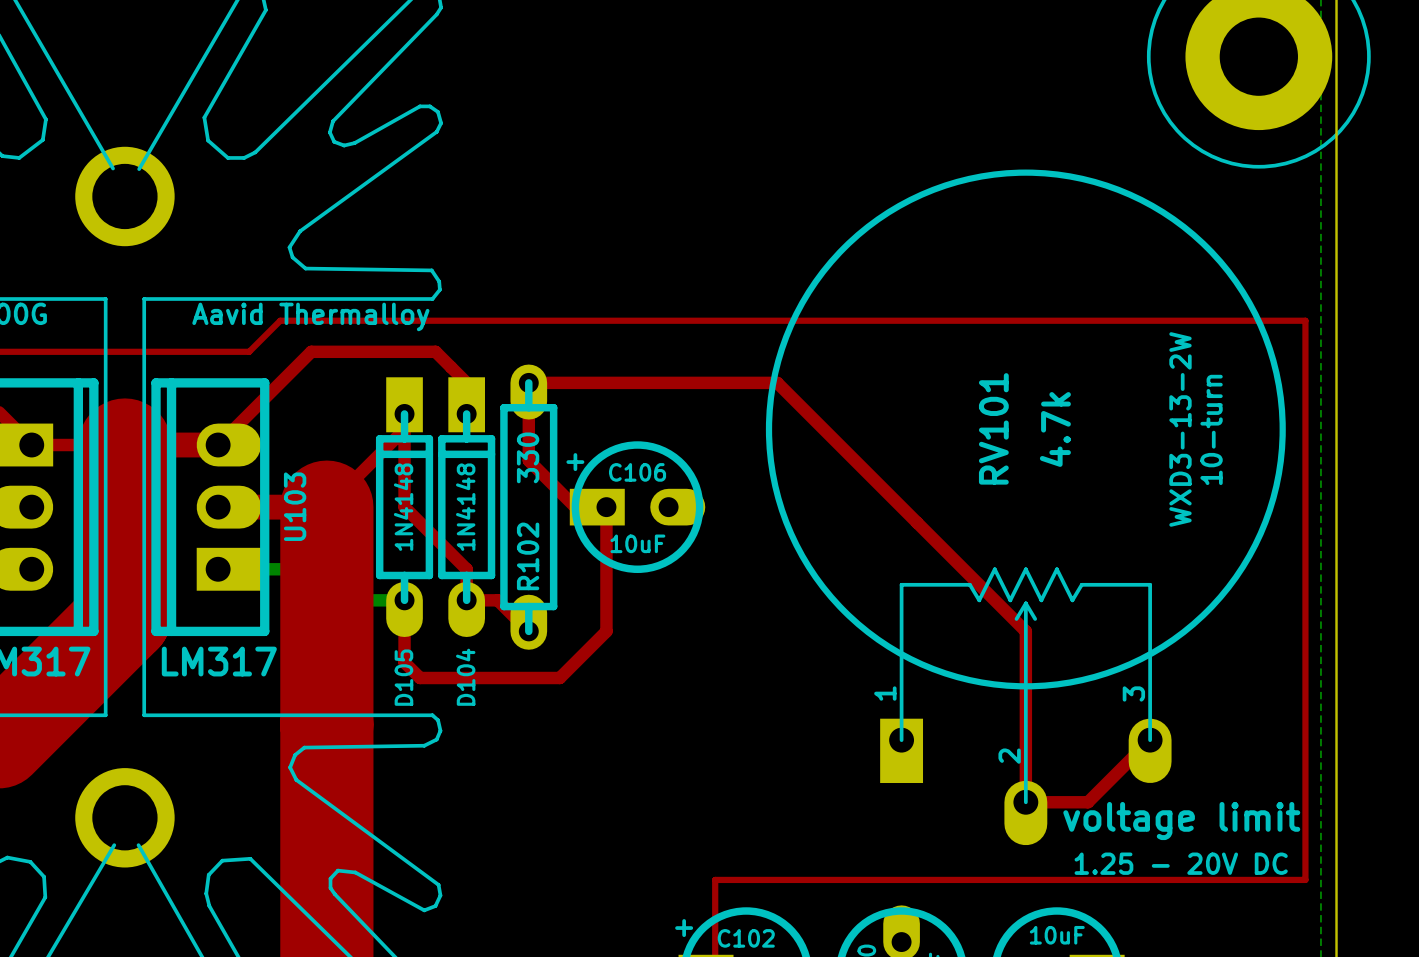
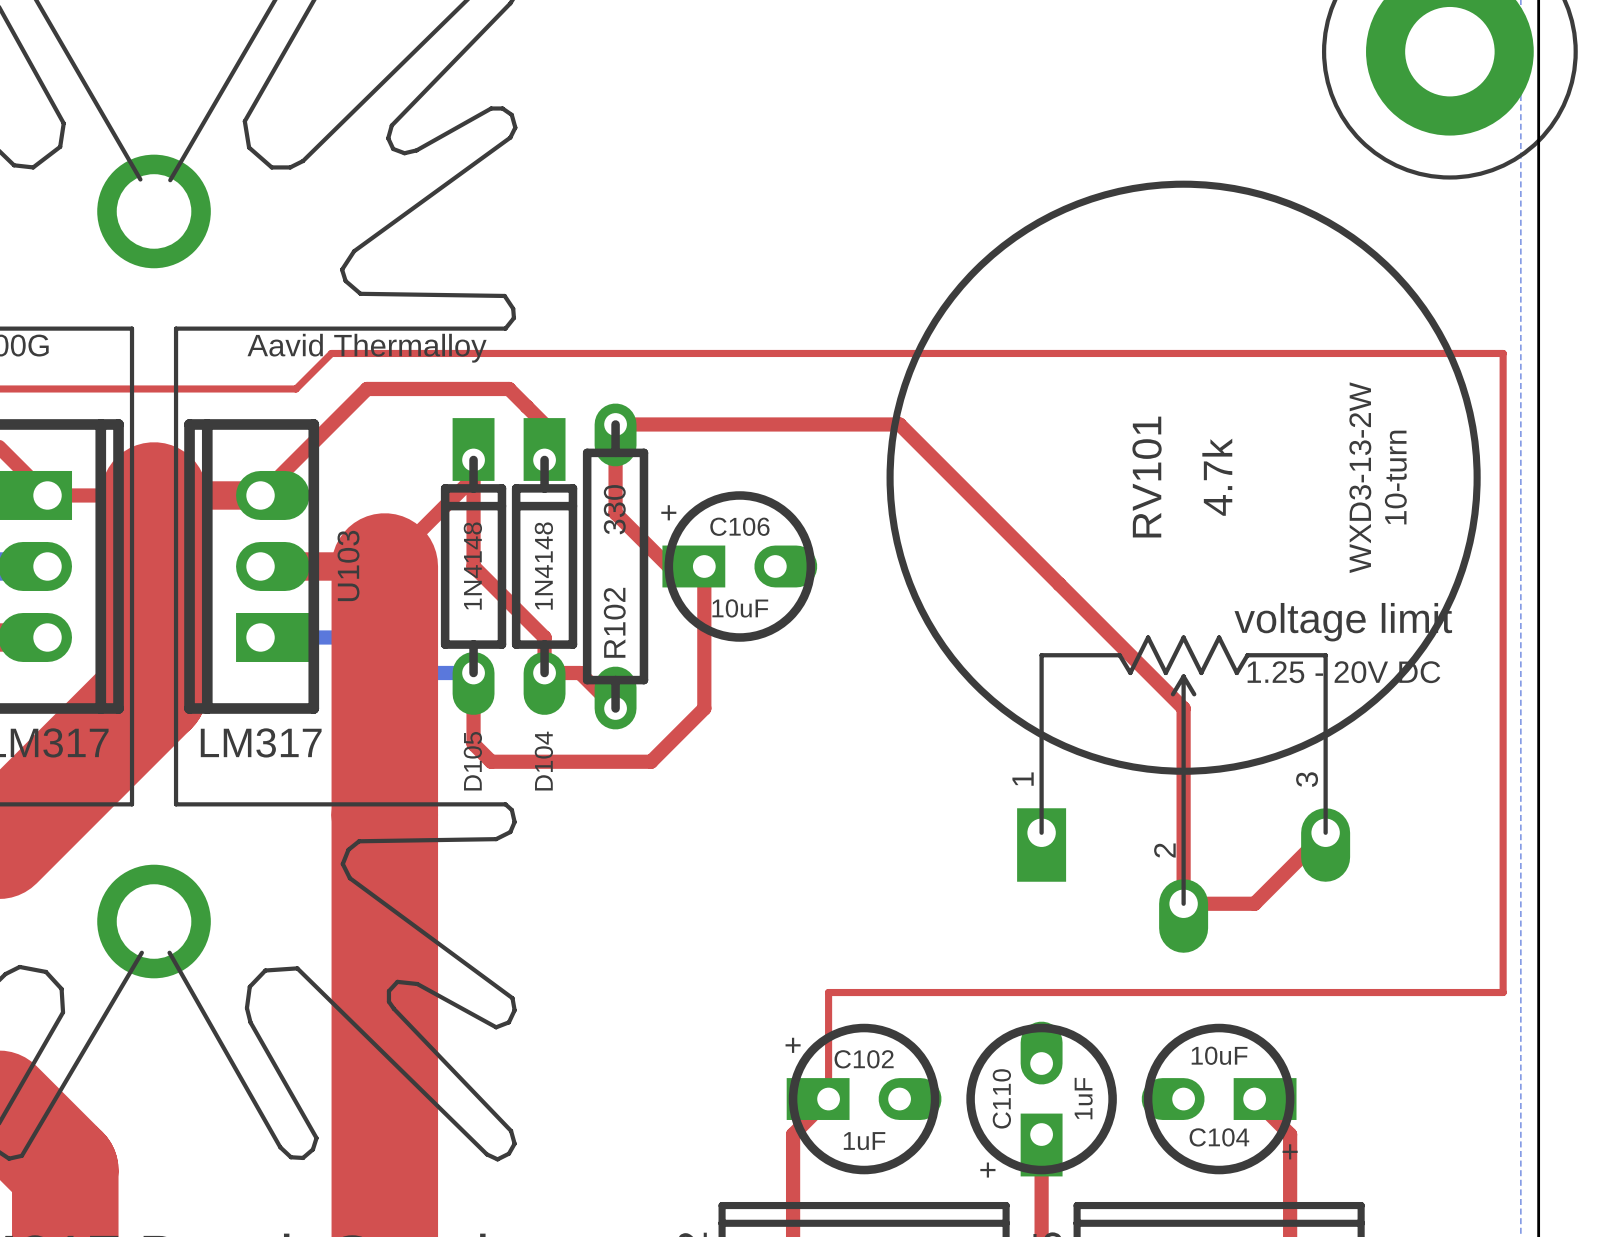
text position: voltage limit (1181, 821) -> voltage limit (1343, 622)
text position: 1.25 - 20V DC (1181, 863) -> 1.25 - 20V DC (1343, 672)

